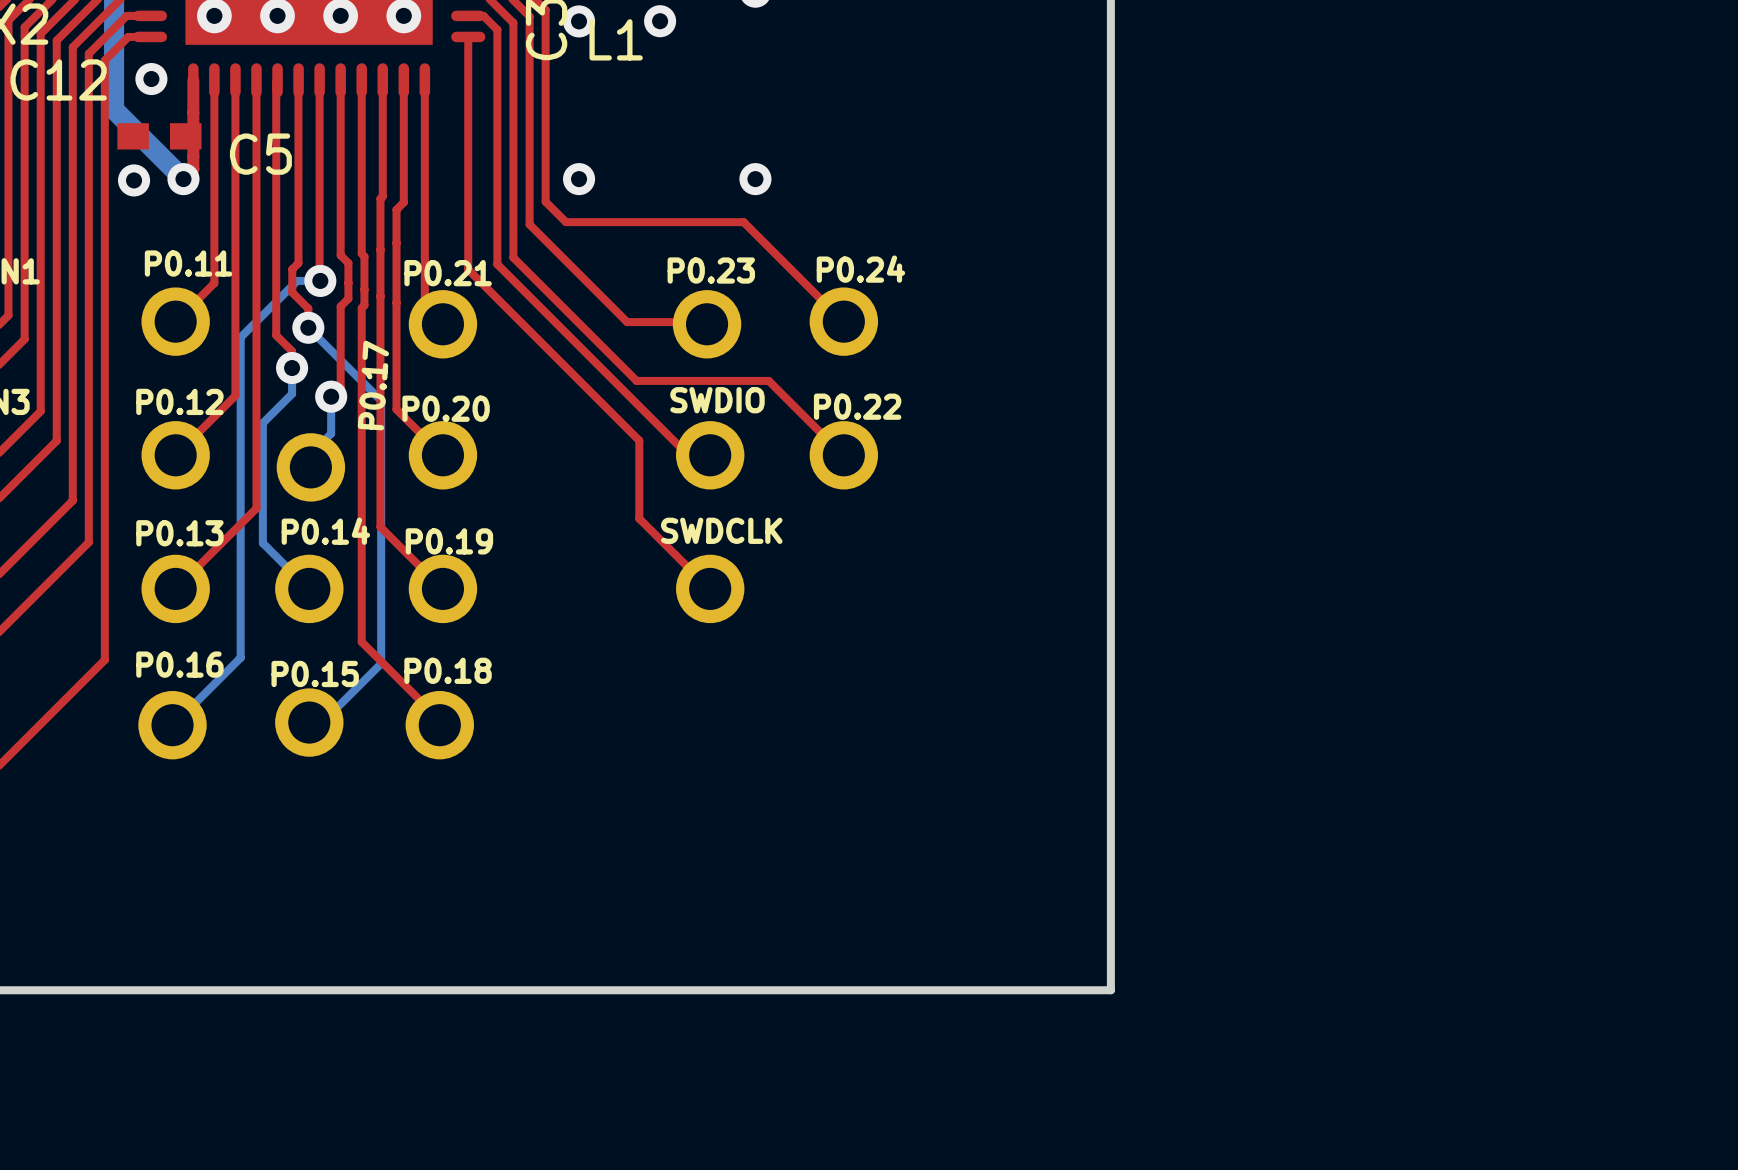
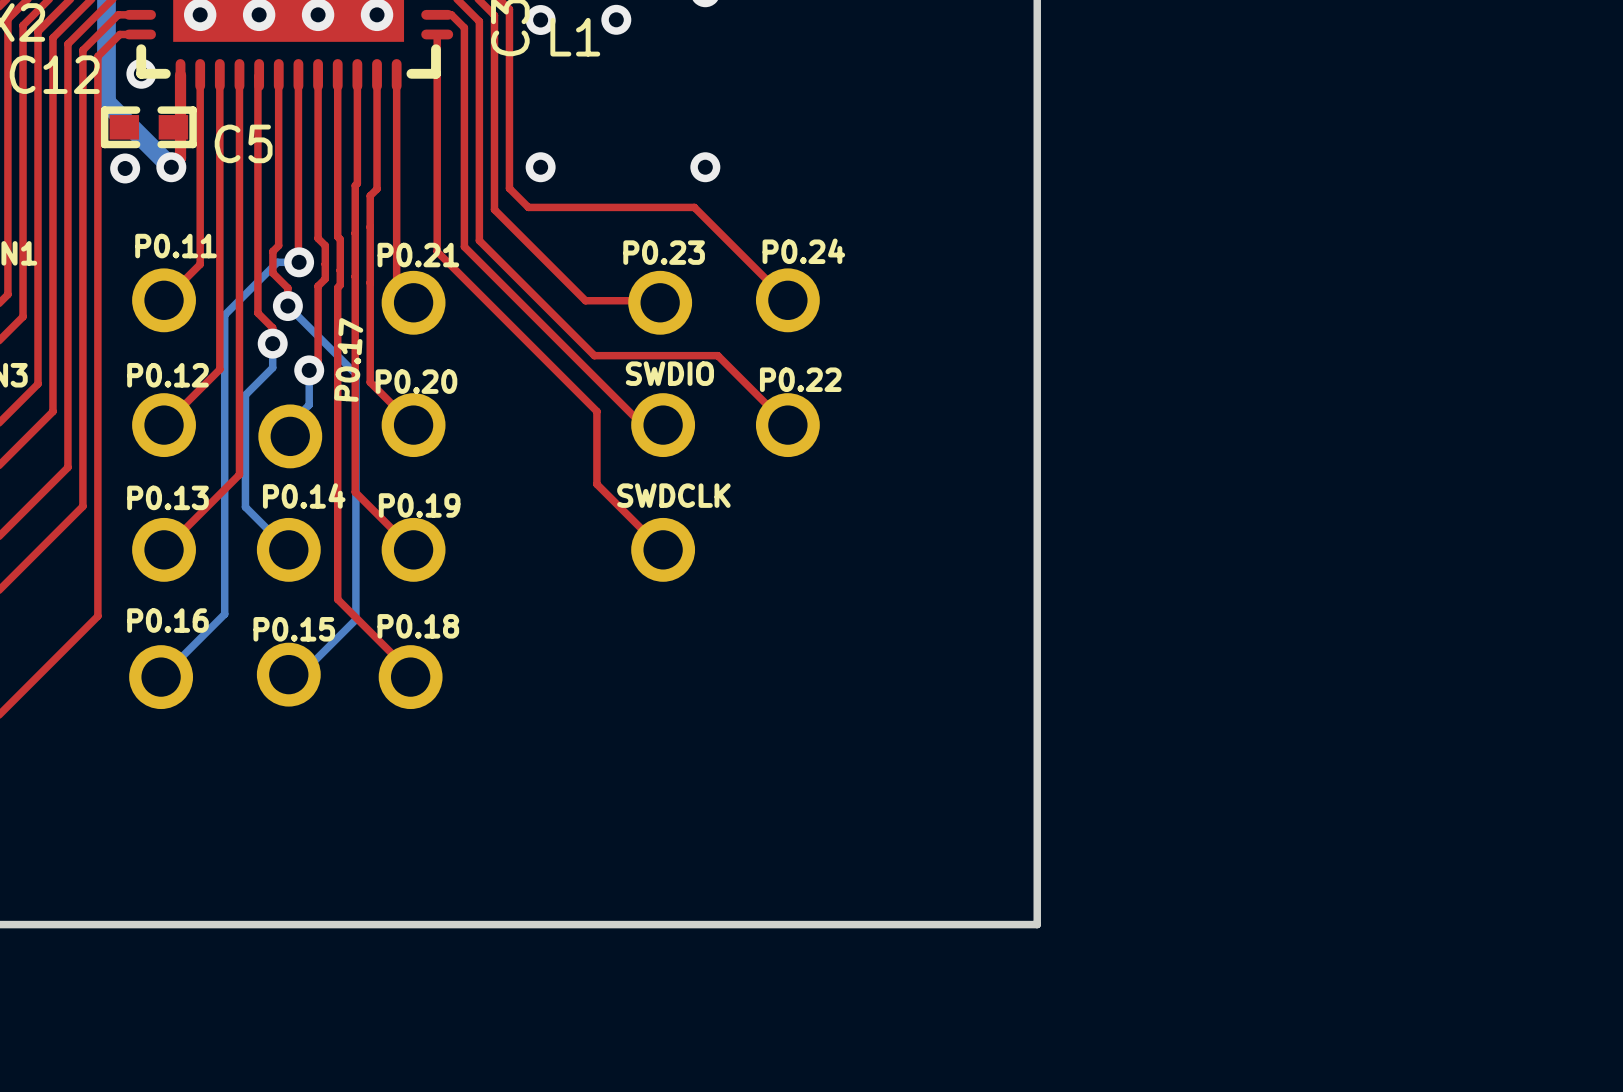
line: none -> (141, 49) (141, 73) (165, 73)
line: none -> (435, 49) (435, 73) (411, 73)
line: none -> (136, 110) (104, 110) (104, 144) (136, 144)
line: none -> (161, 110) (193, 110) (193, 144) (161, 144)

